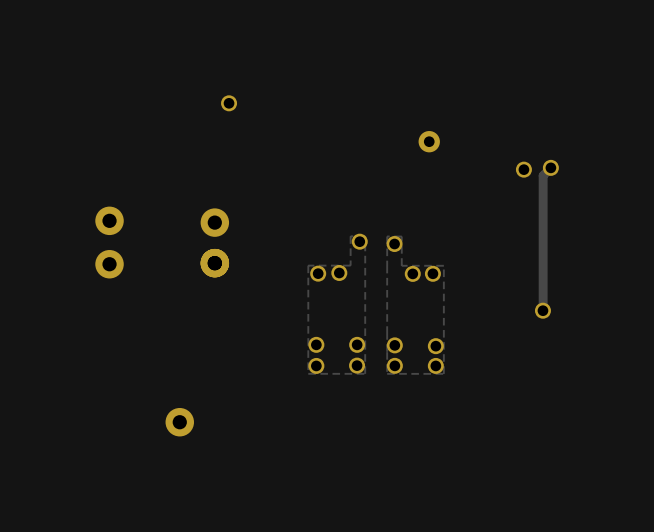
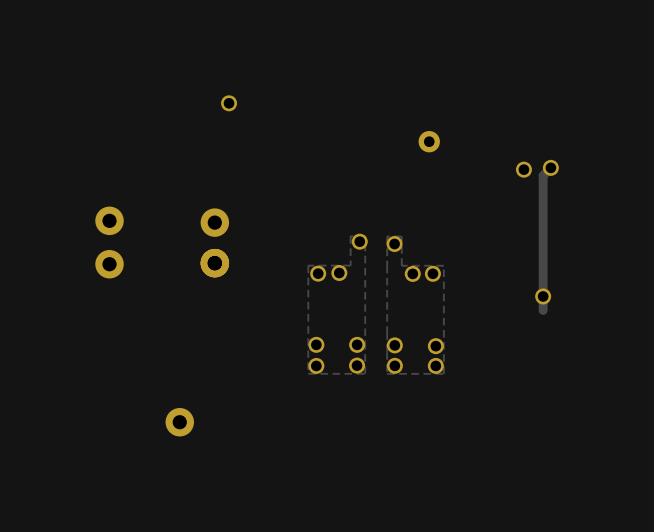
via position: (542, 310) -> (543, 296)

